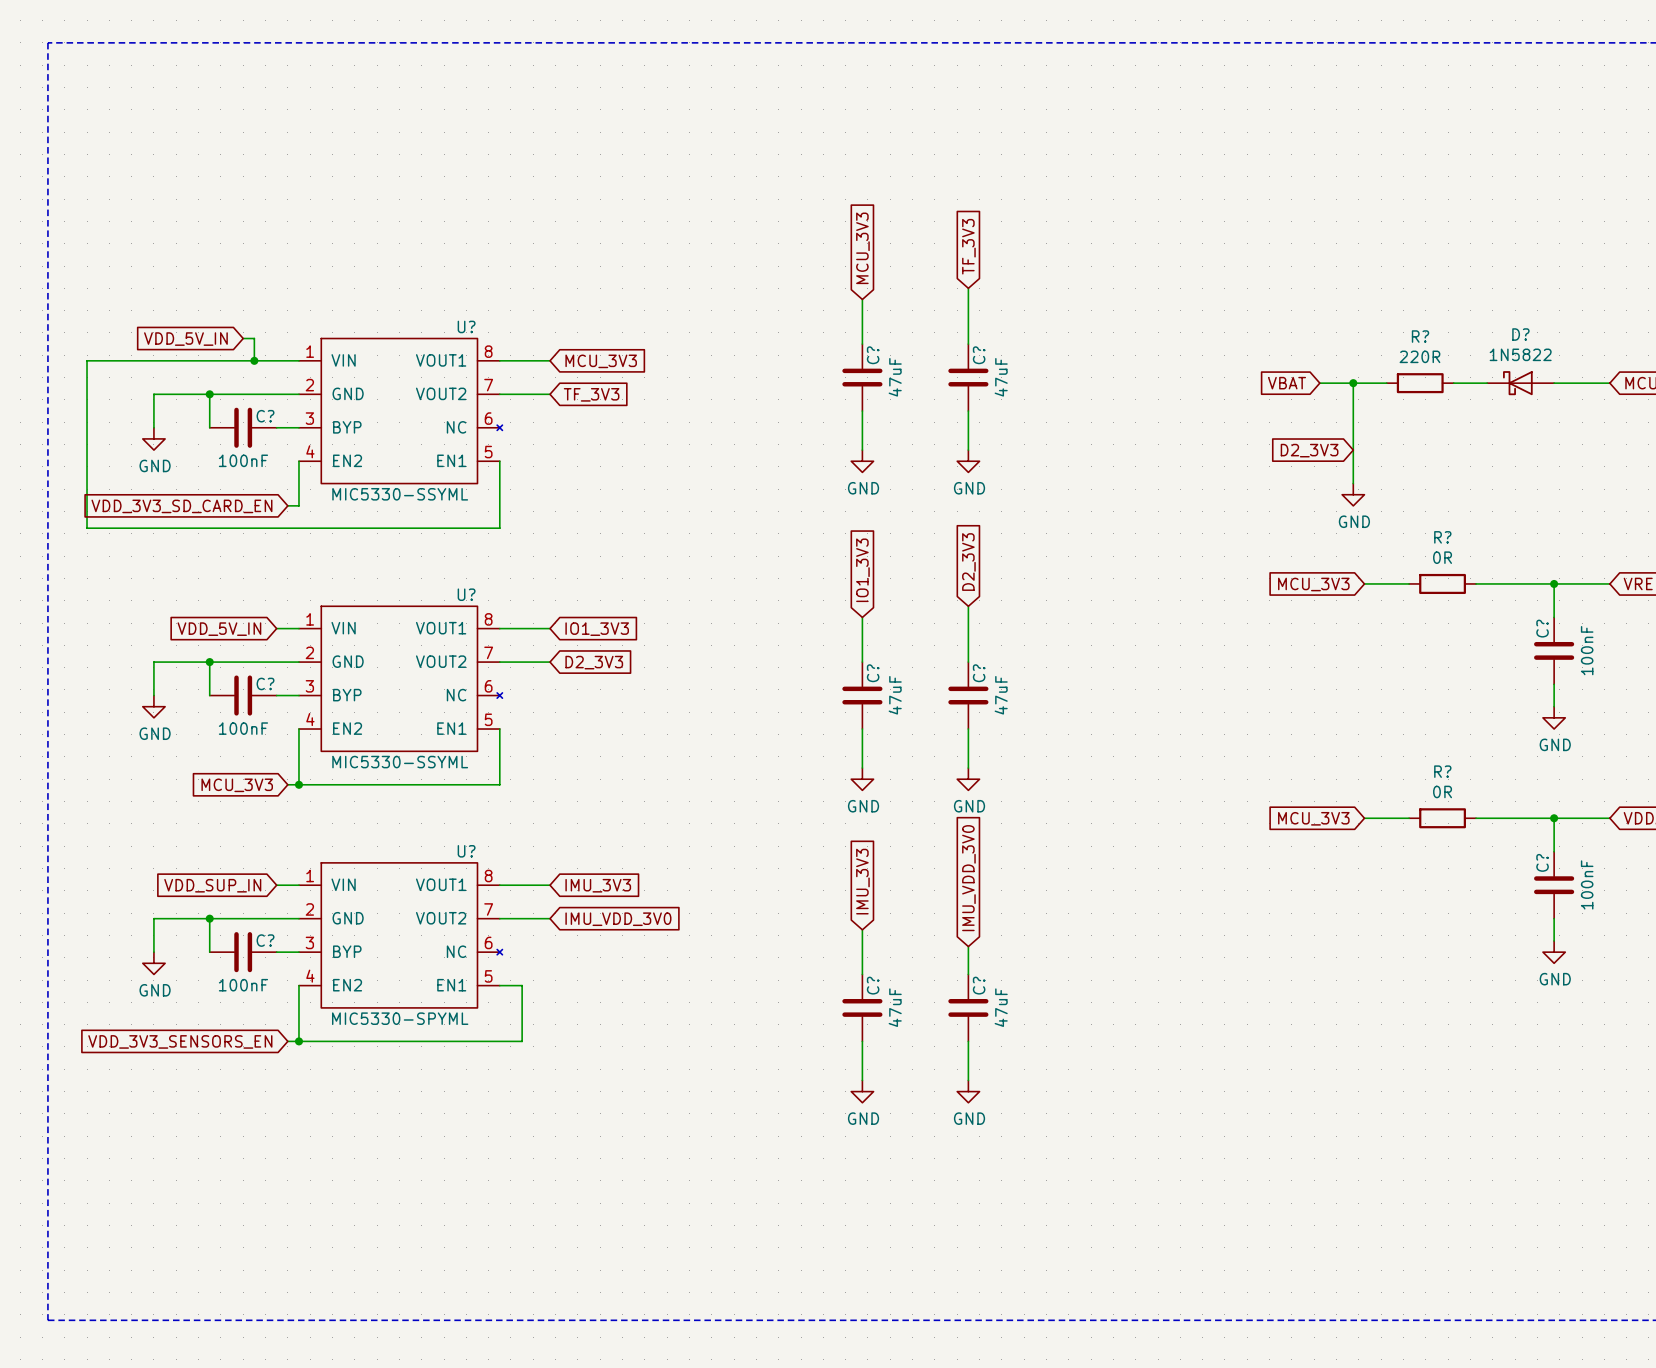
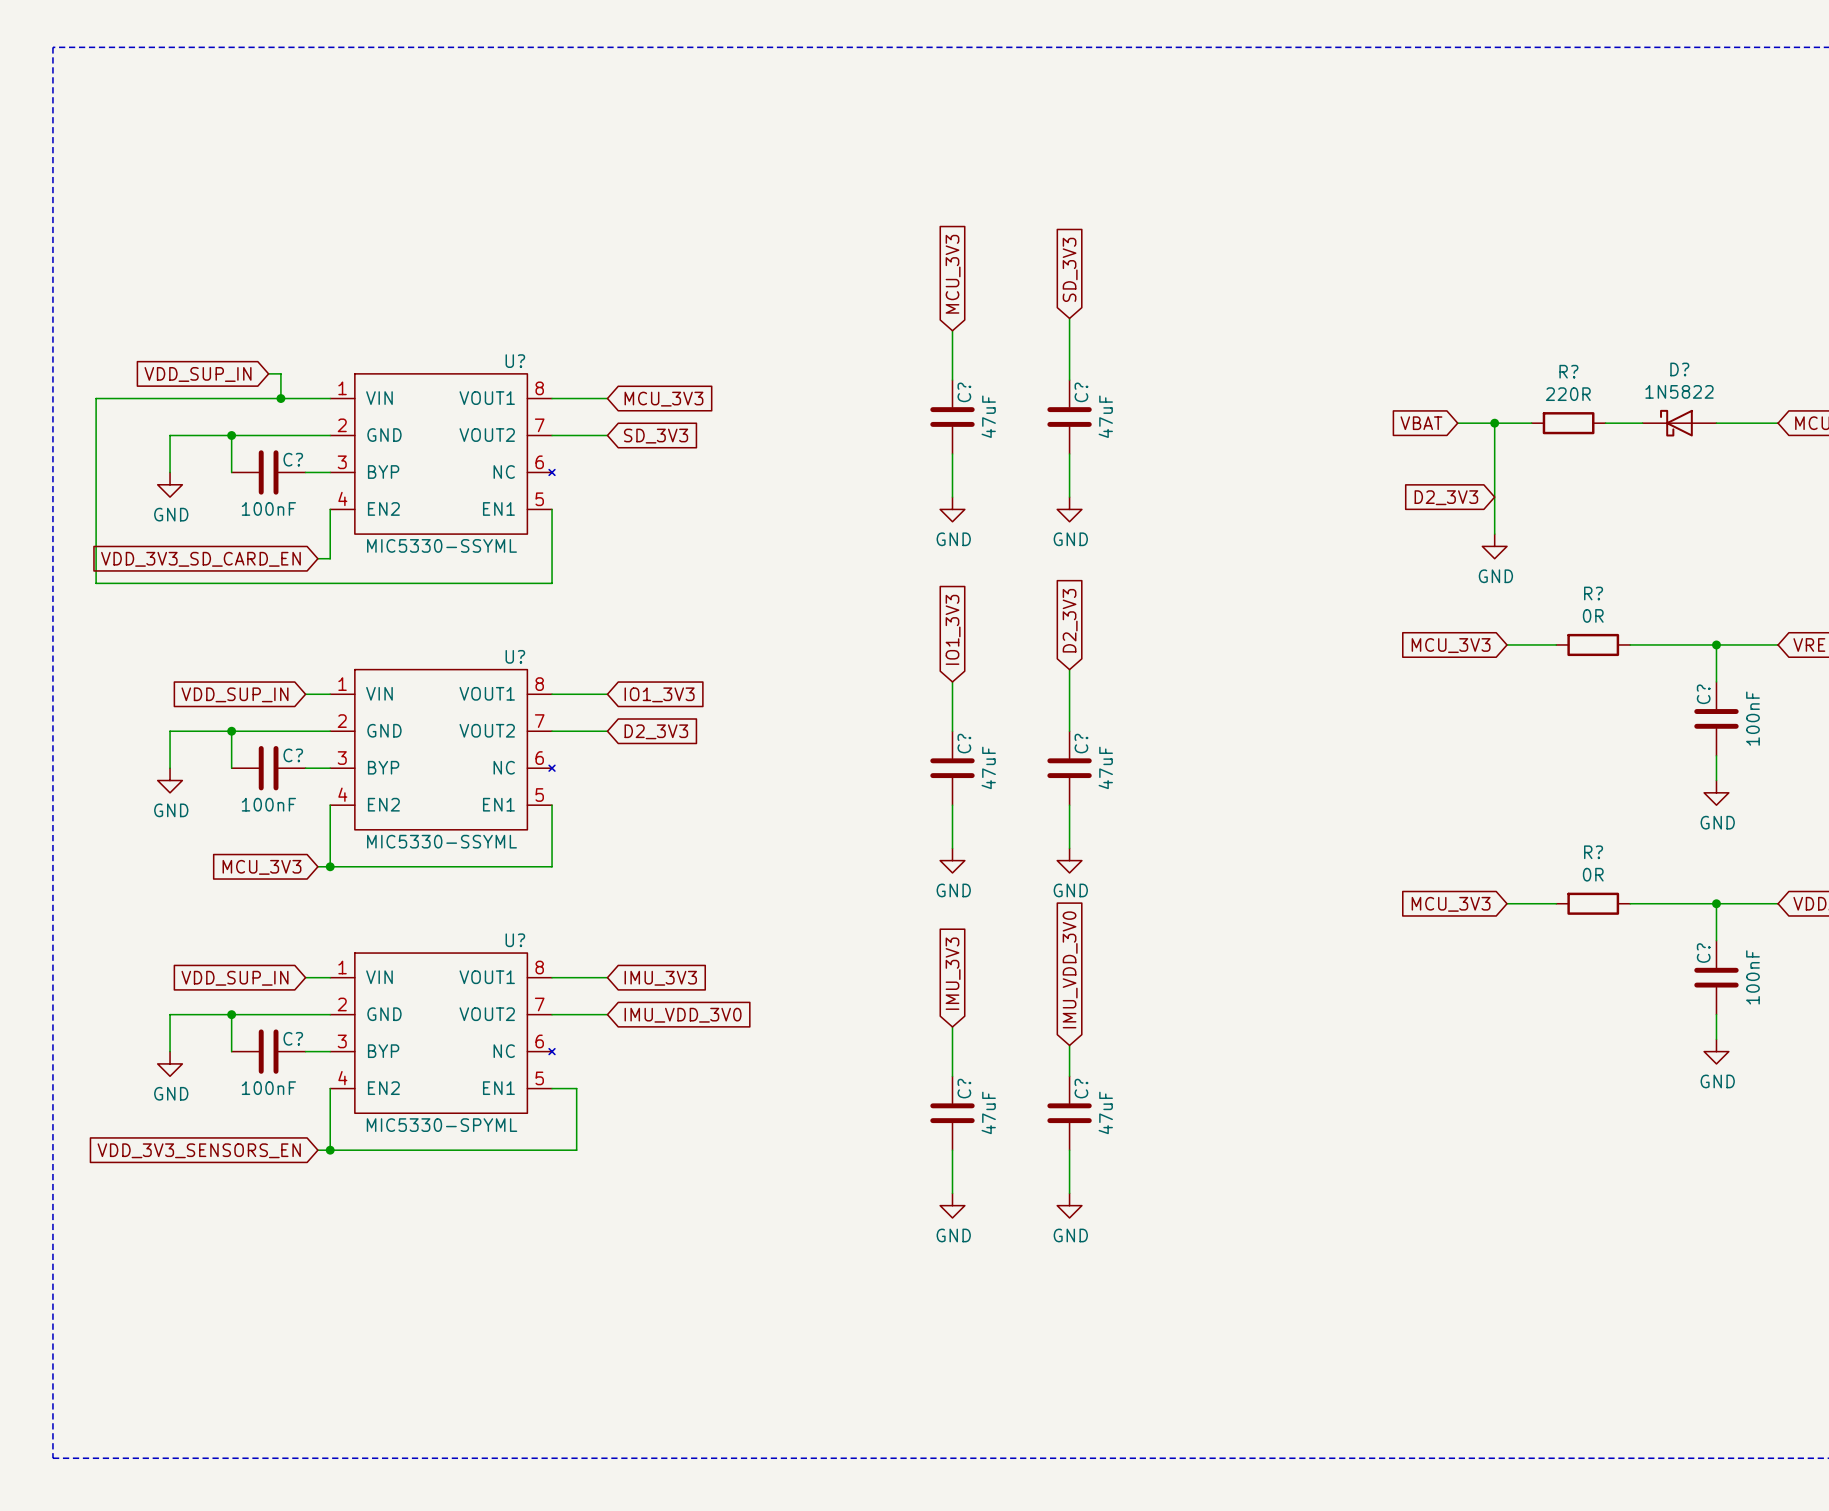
global label: TF_3V3 (968, 246) -> SD_3V3 (1070, 269)
global label: VDD_5V_IN (185, 339) -> VDD_SUP_IN (198, 374)
global label: TF_3V3 (591, 394) -> SD_3V3 (656, 436)
global label: VDD_5V_IN (219, 629) -> VDD_SUP_IN (234, 694)

